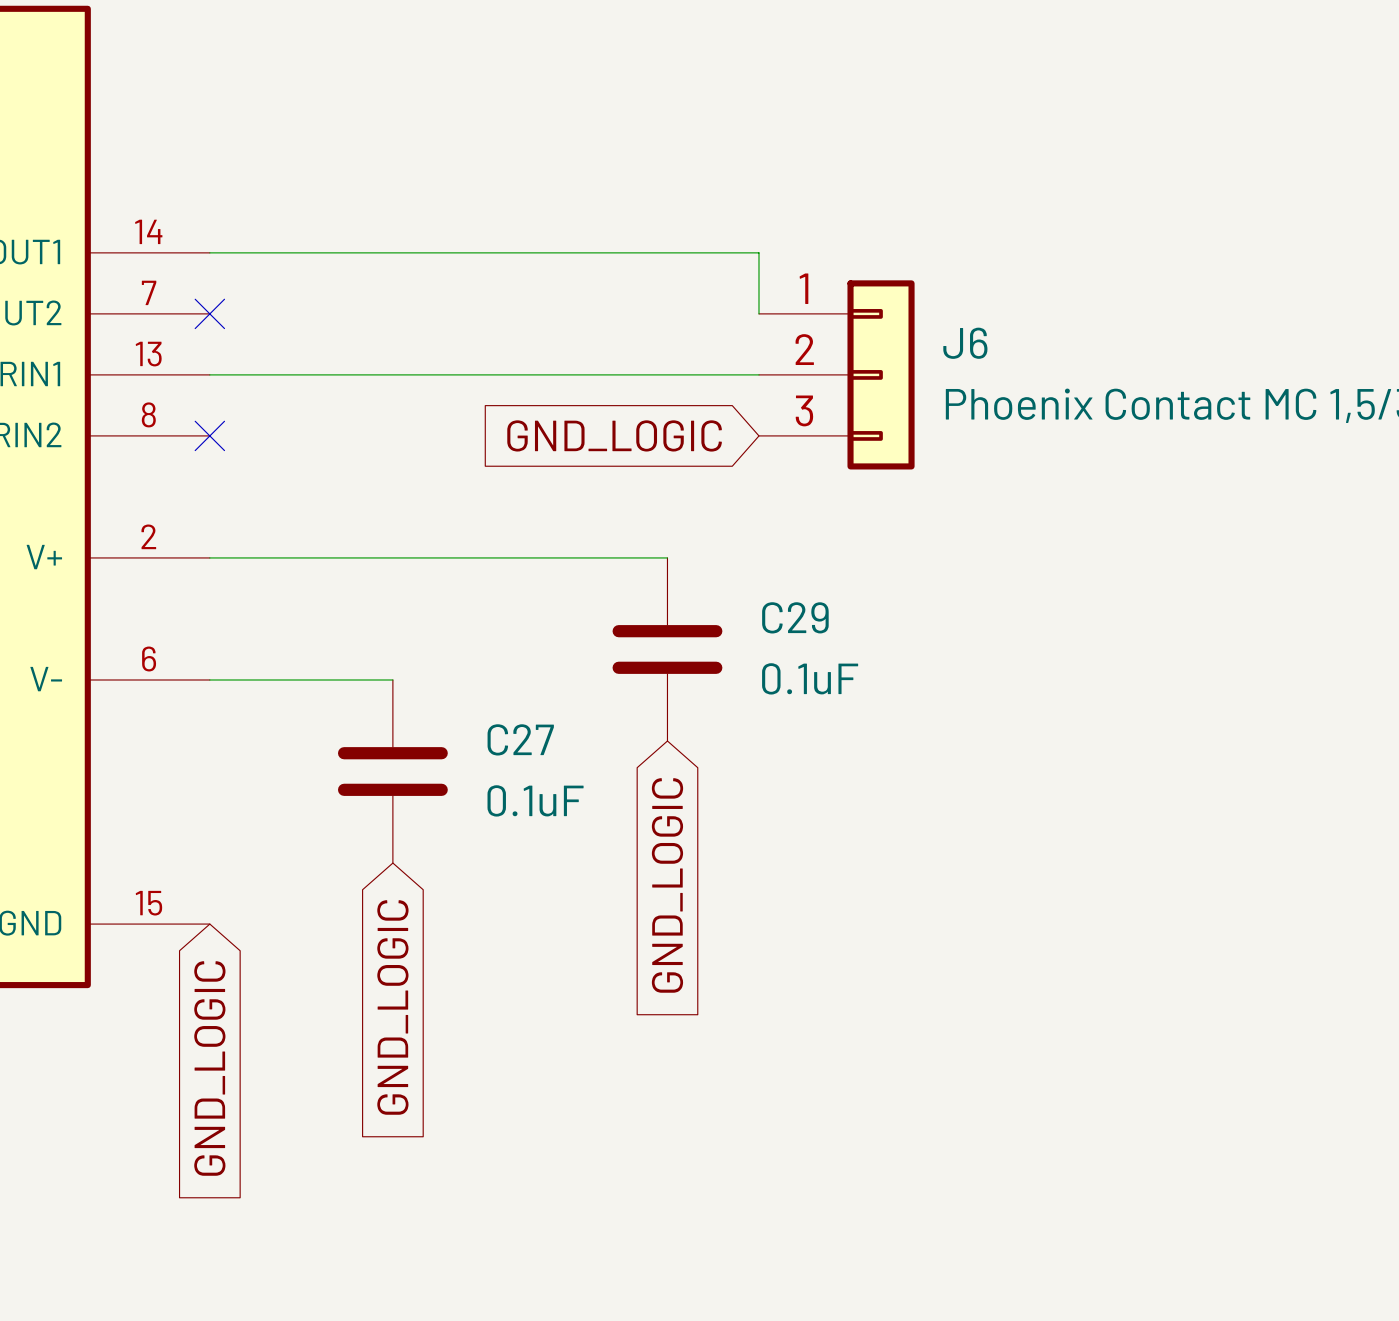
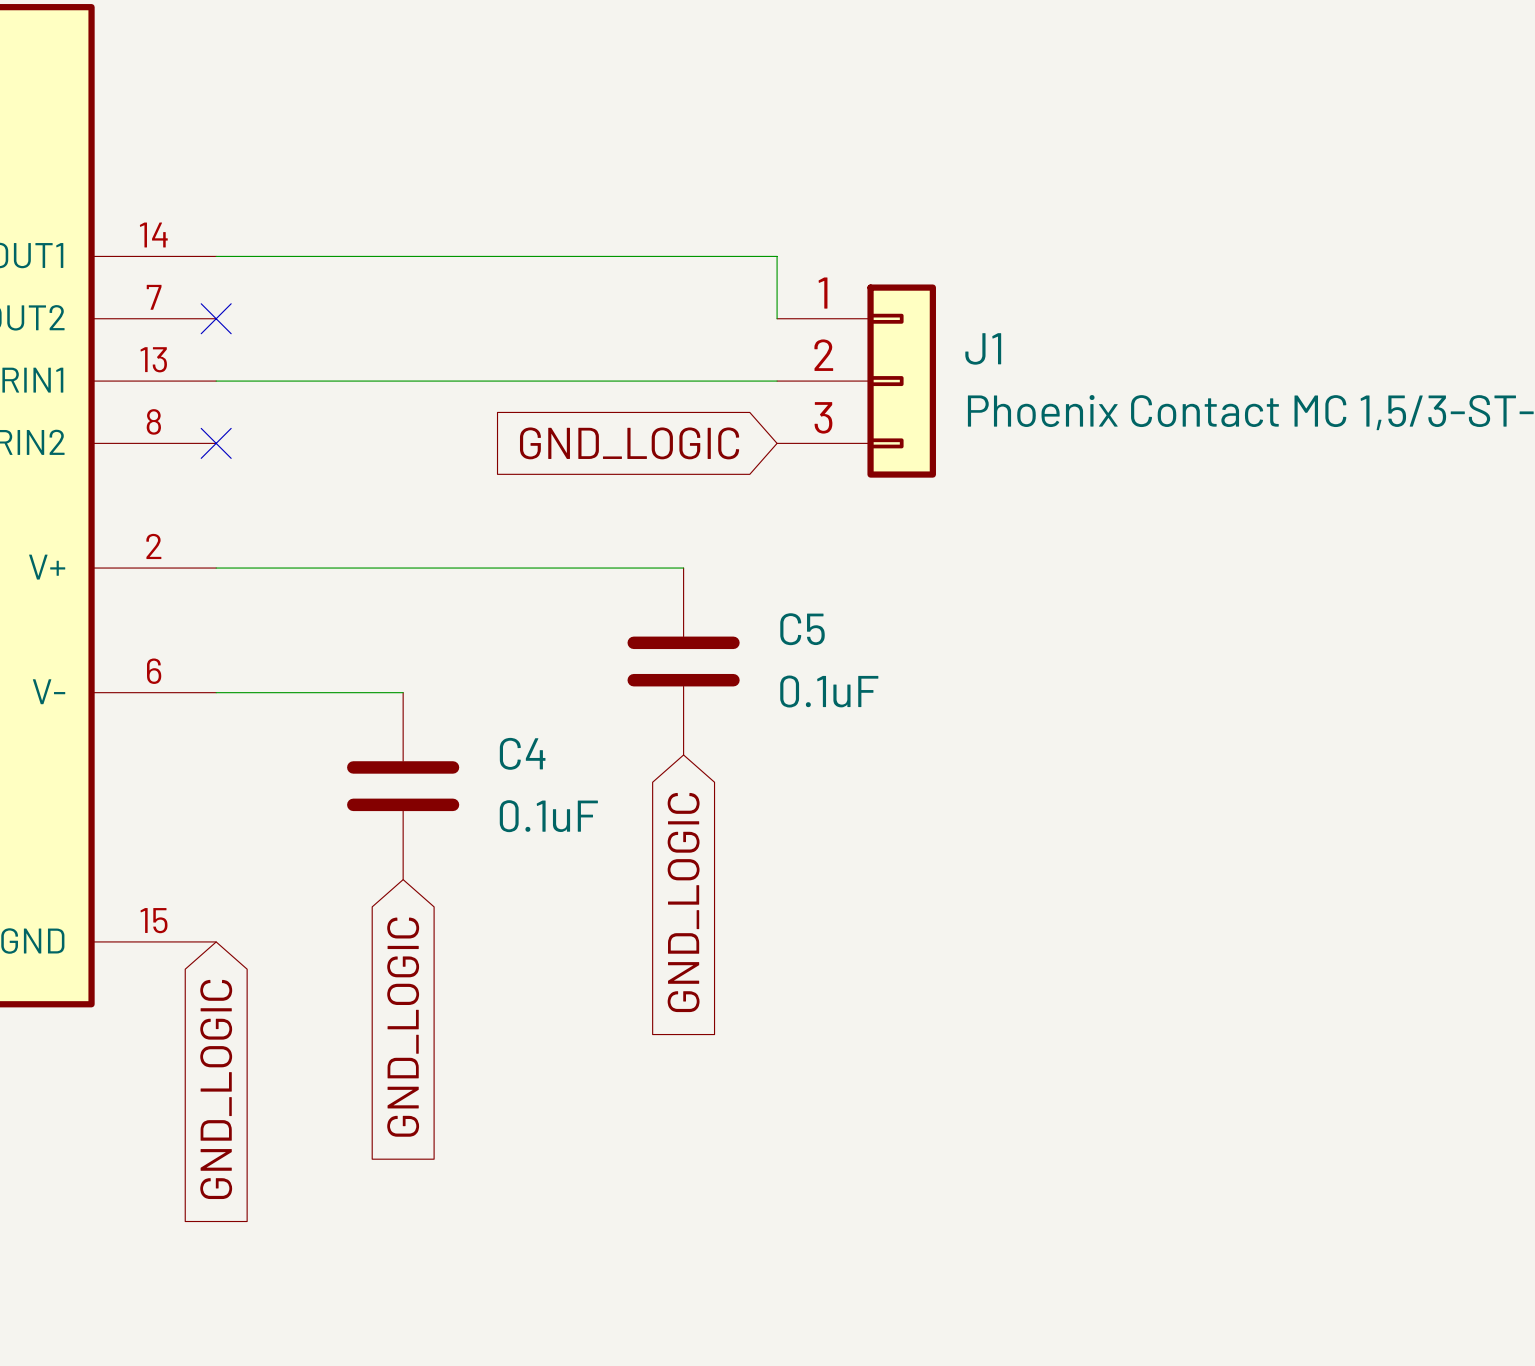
J6 name: J6 (965, 343) -> J1 (983, 348)
C29 name: C29 (795, 617) -> C5 (802, 629)
C27 name: C27 (520, 739) -> C4 (522, 753)

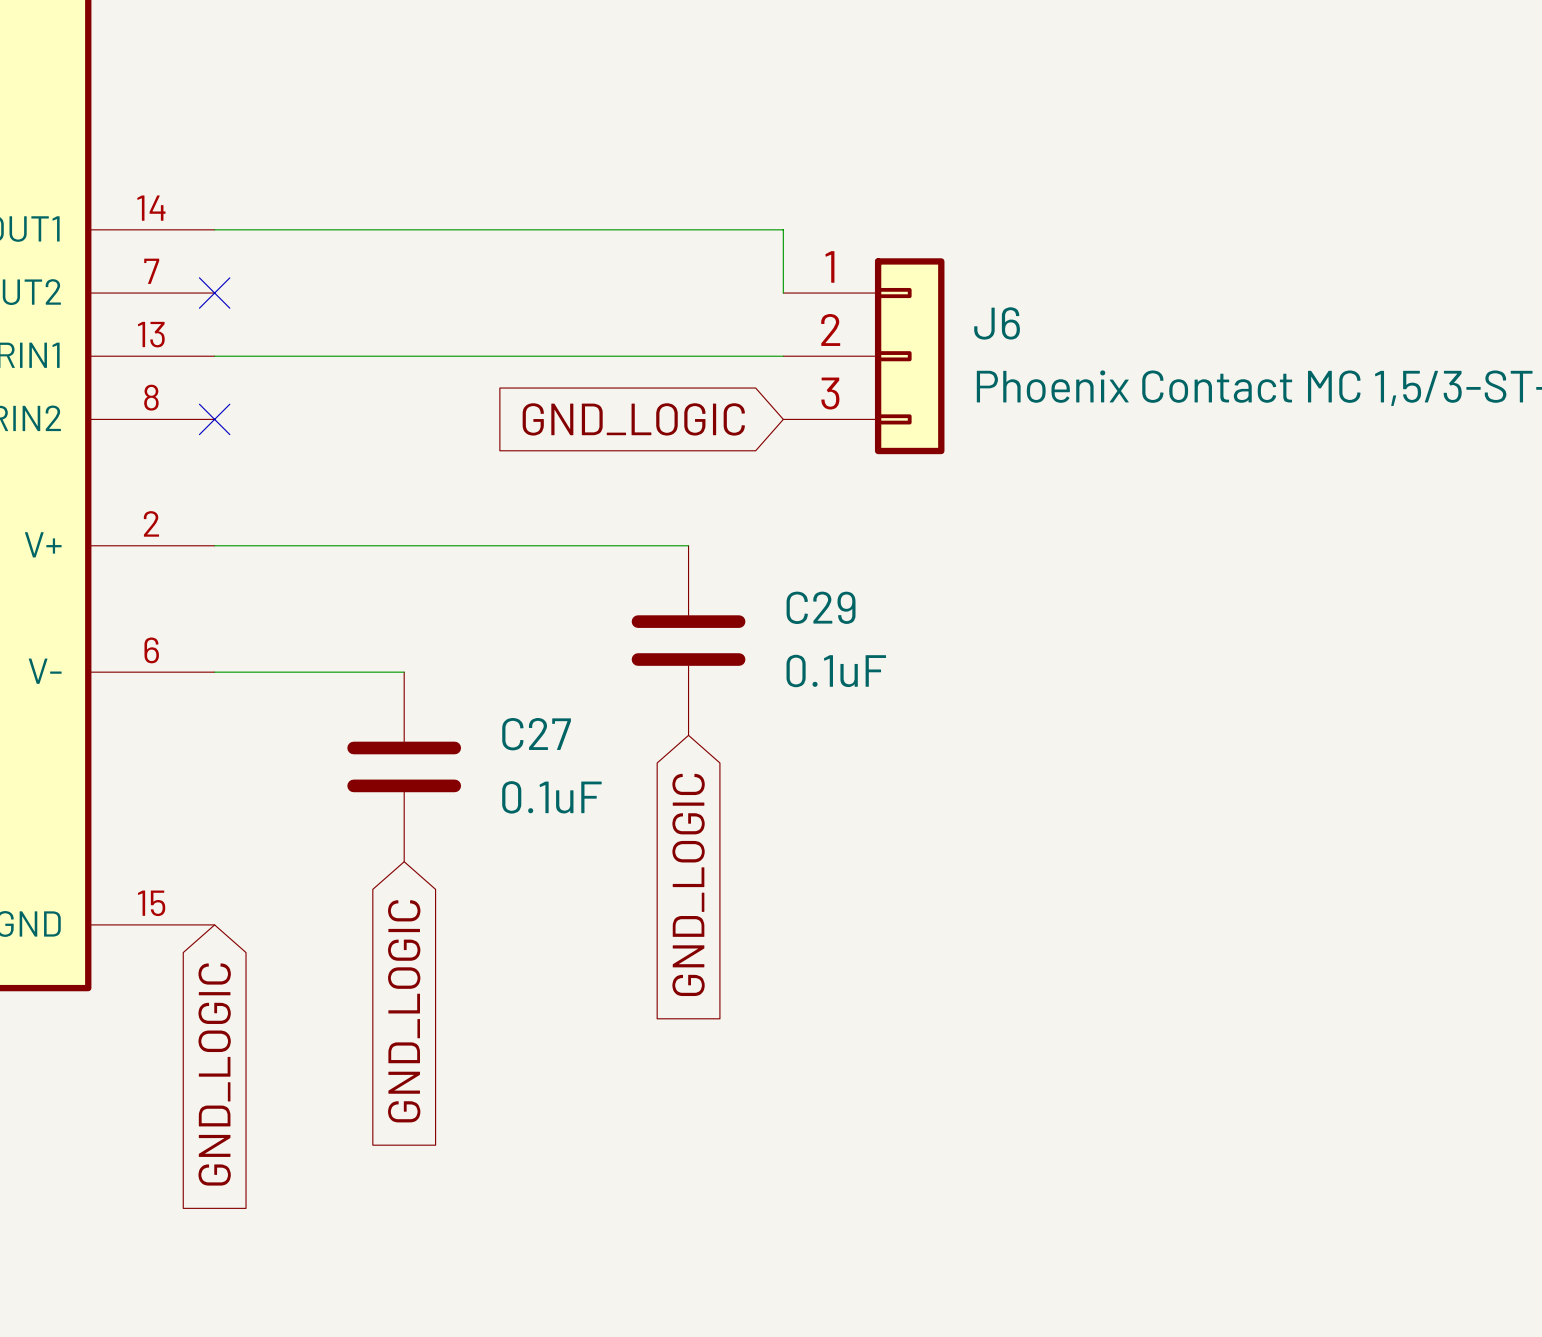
J1 name: J1 (983, 348) -> J6 (997, 323)
C5 name: C5 (802, 629) -> C29 (821, 607)
C4 name: C4 (522, 753) -> C27 (536, 734)

